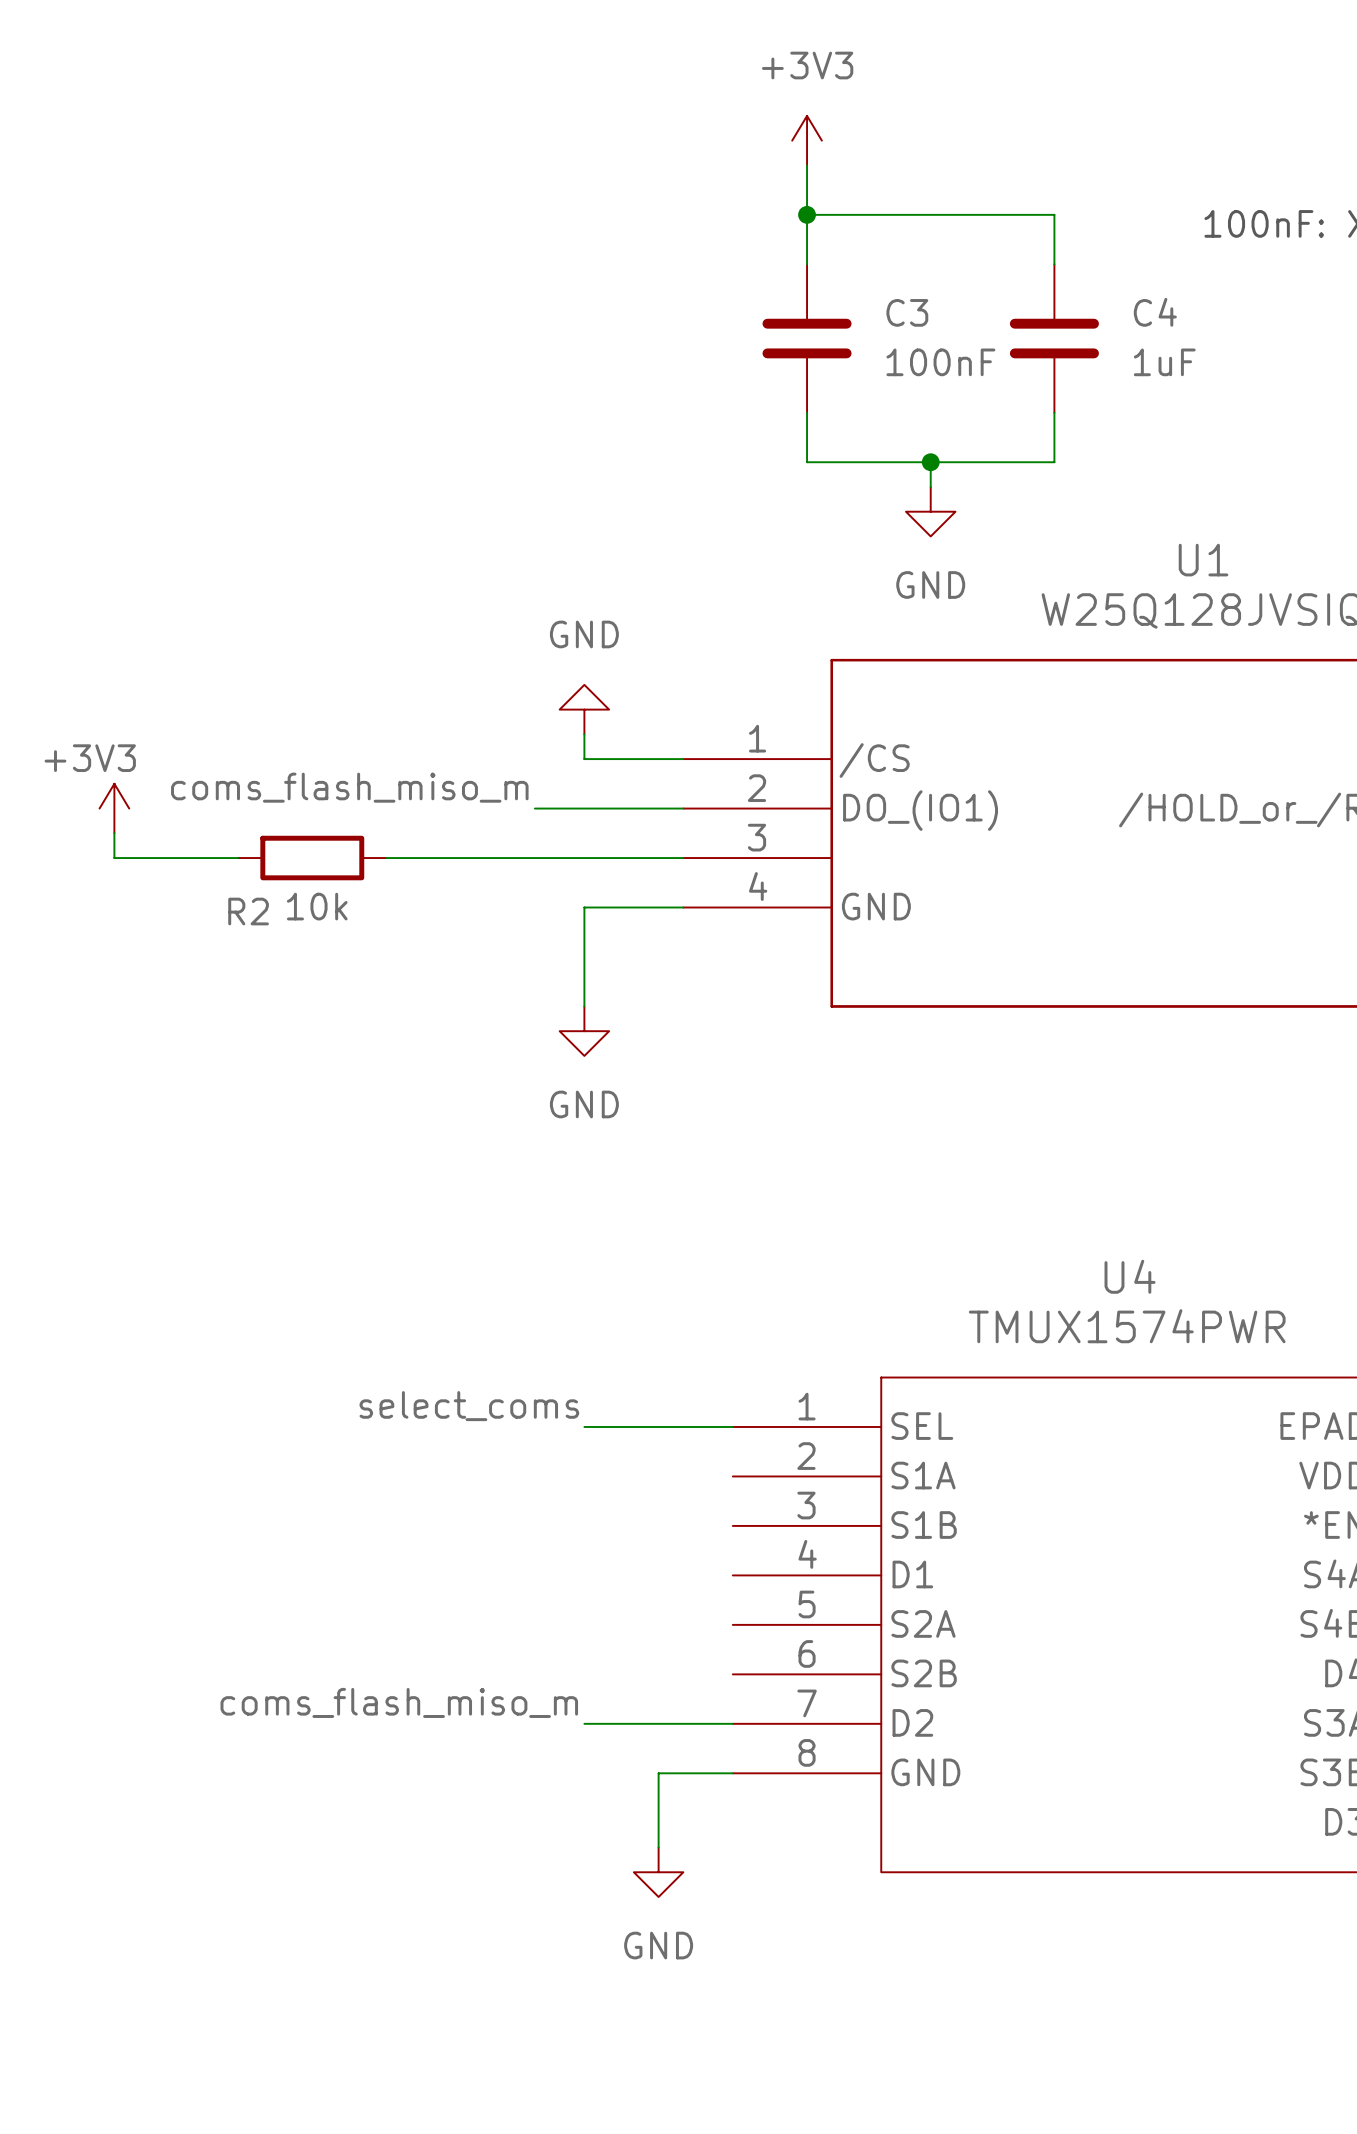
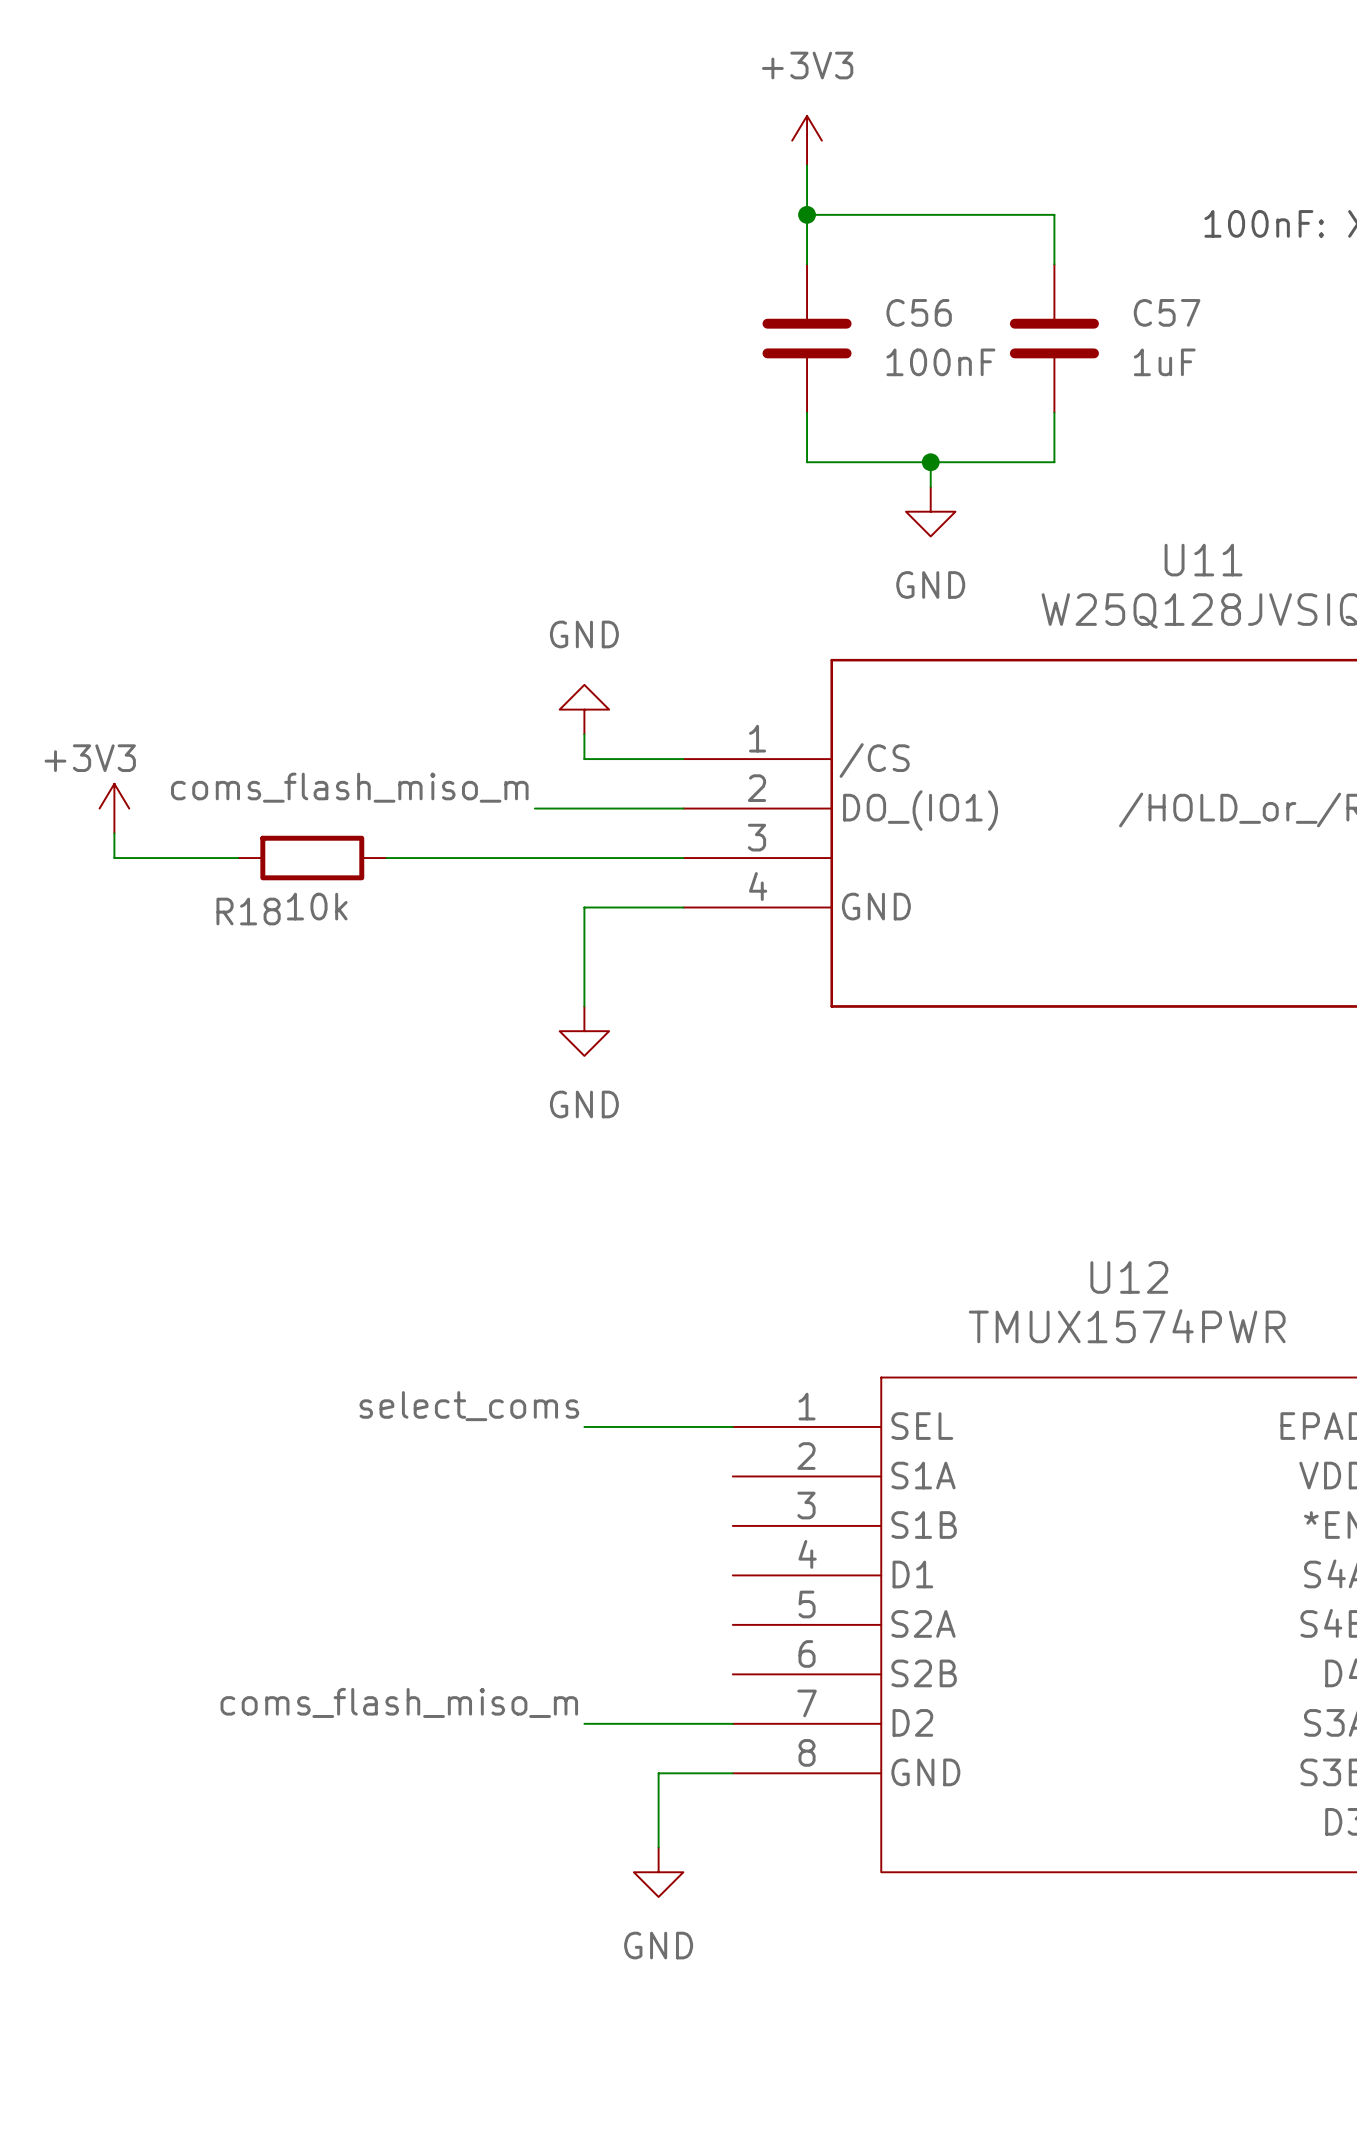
C3 name: C3 (907, 312) -> C56 (919, 312)
C4 name: C4 (1155, 312) -> C57 (1167, 312)
U1 name: U1 (1203, 560) -> U11 (1203, 560)
R2 name: R2 (248, 911) -> R18 (248, 911)
U4 name: U4 (1130, 1276) -> U12 (1129, 1277)

